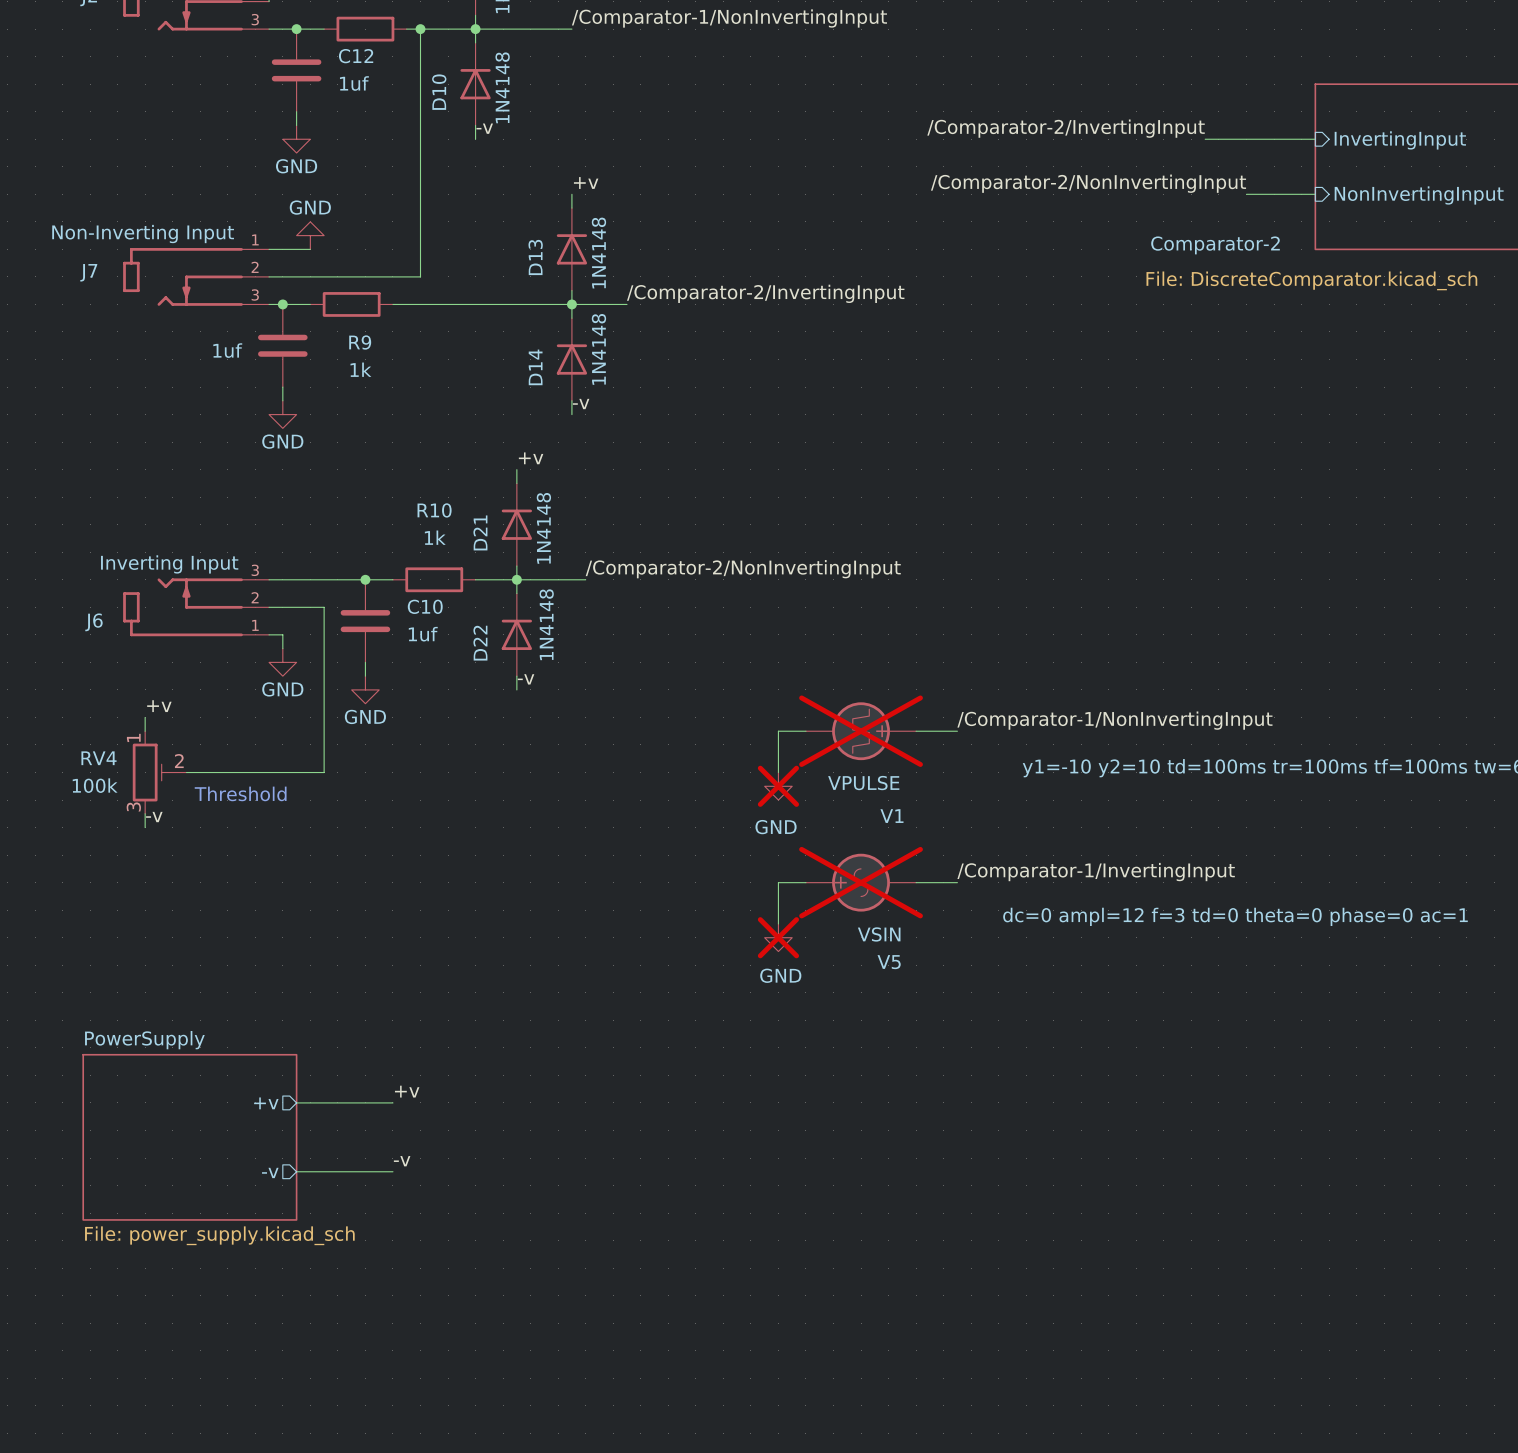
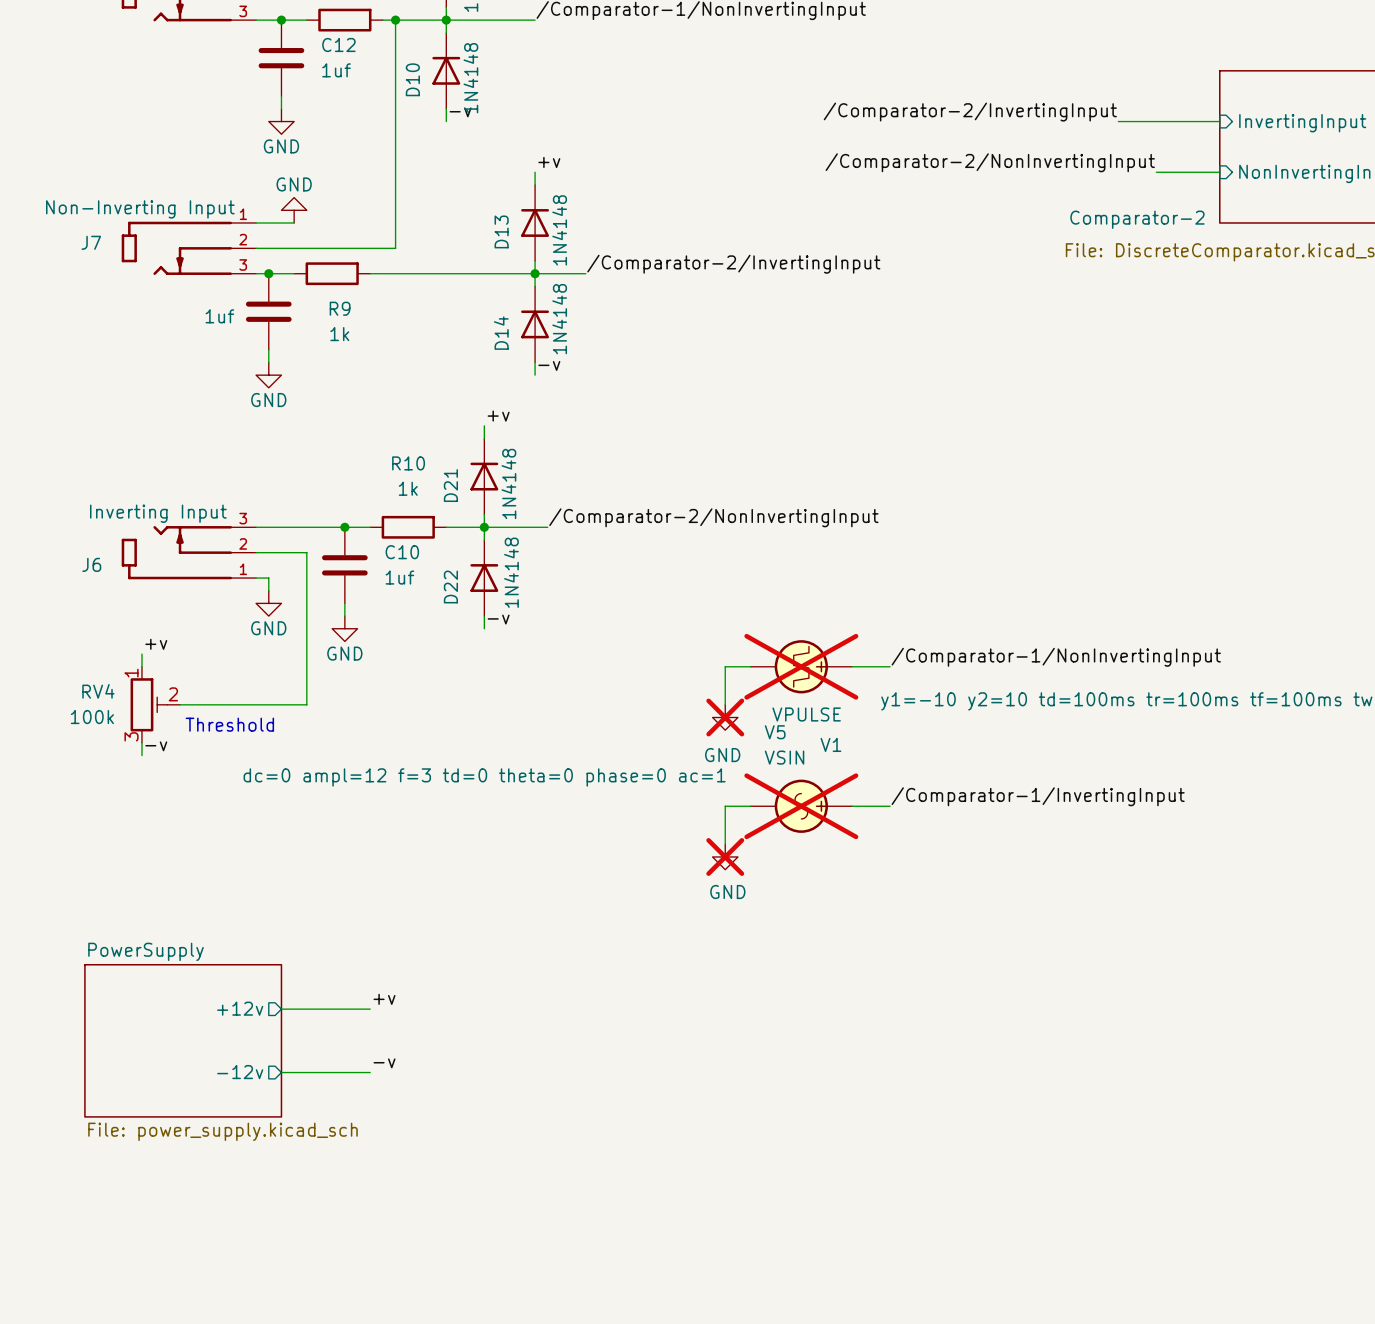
V5 rotation: 0° (861, 882) -> 180° (801, 806)
sheet pin: +v (266, 1103) -> +12v (240, 1008)
sheet pin: -v (270, 1172) -> -12v (240, 1072)

